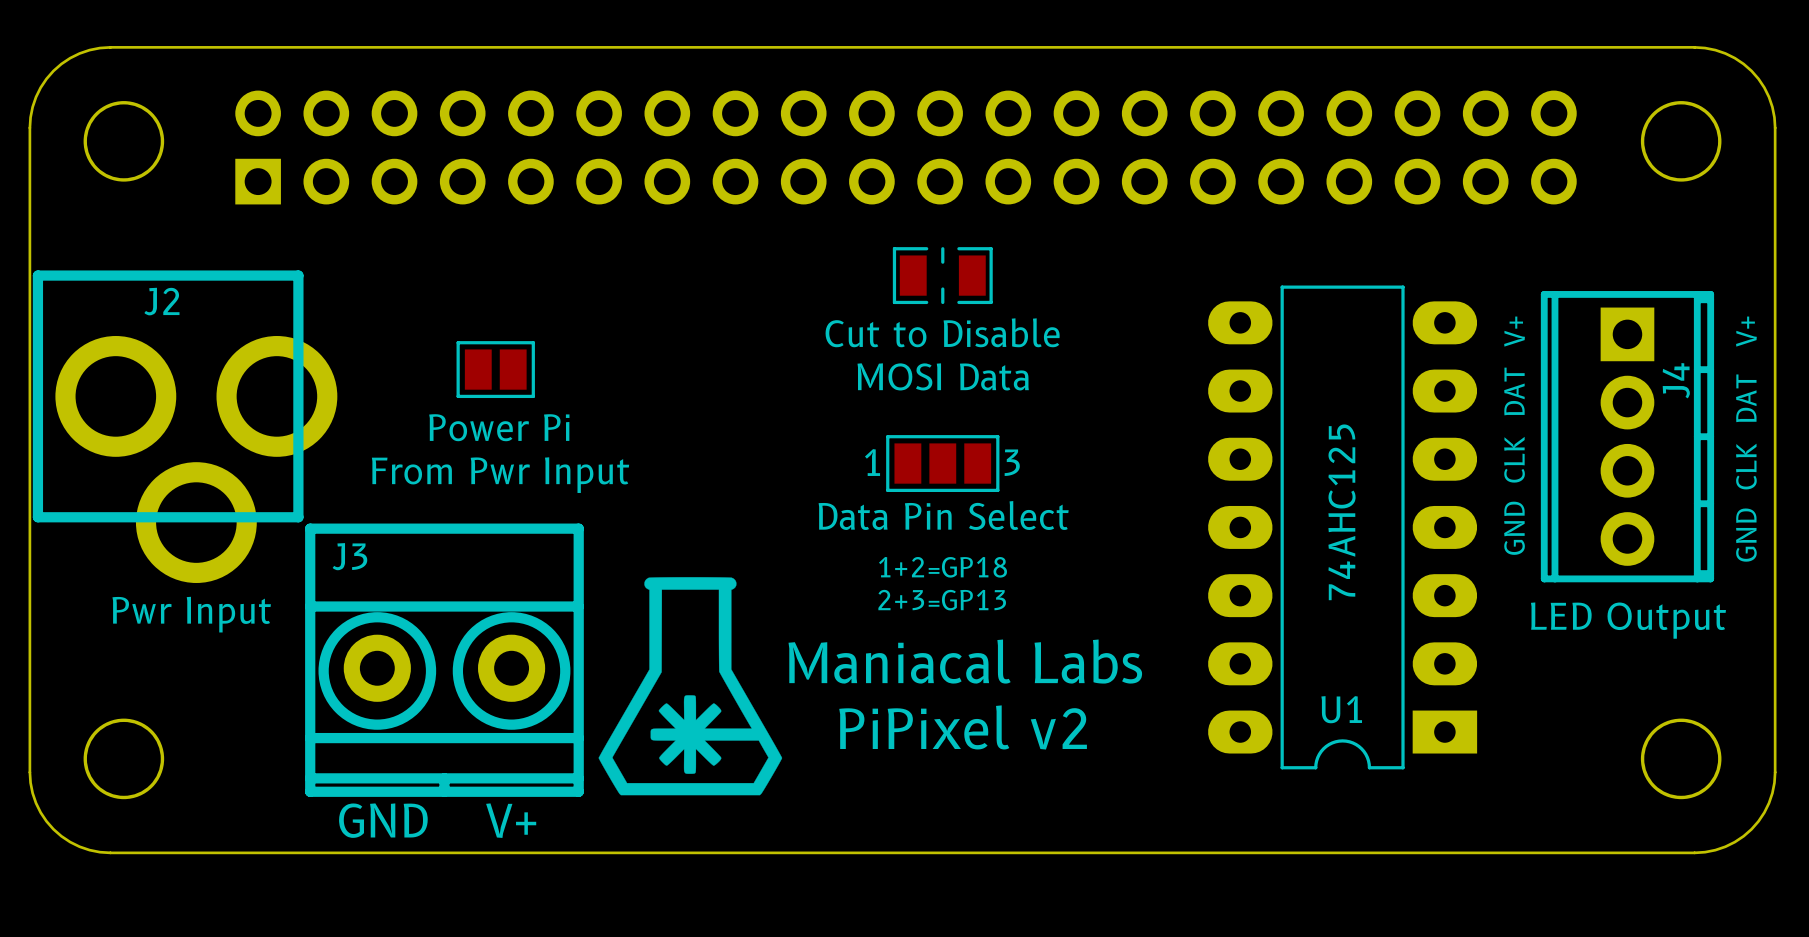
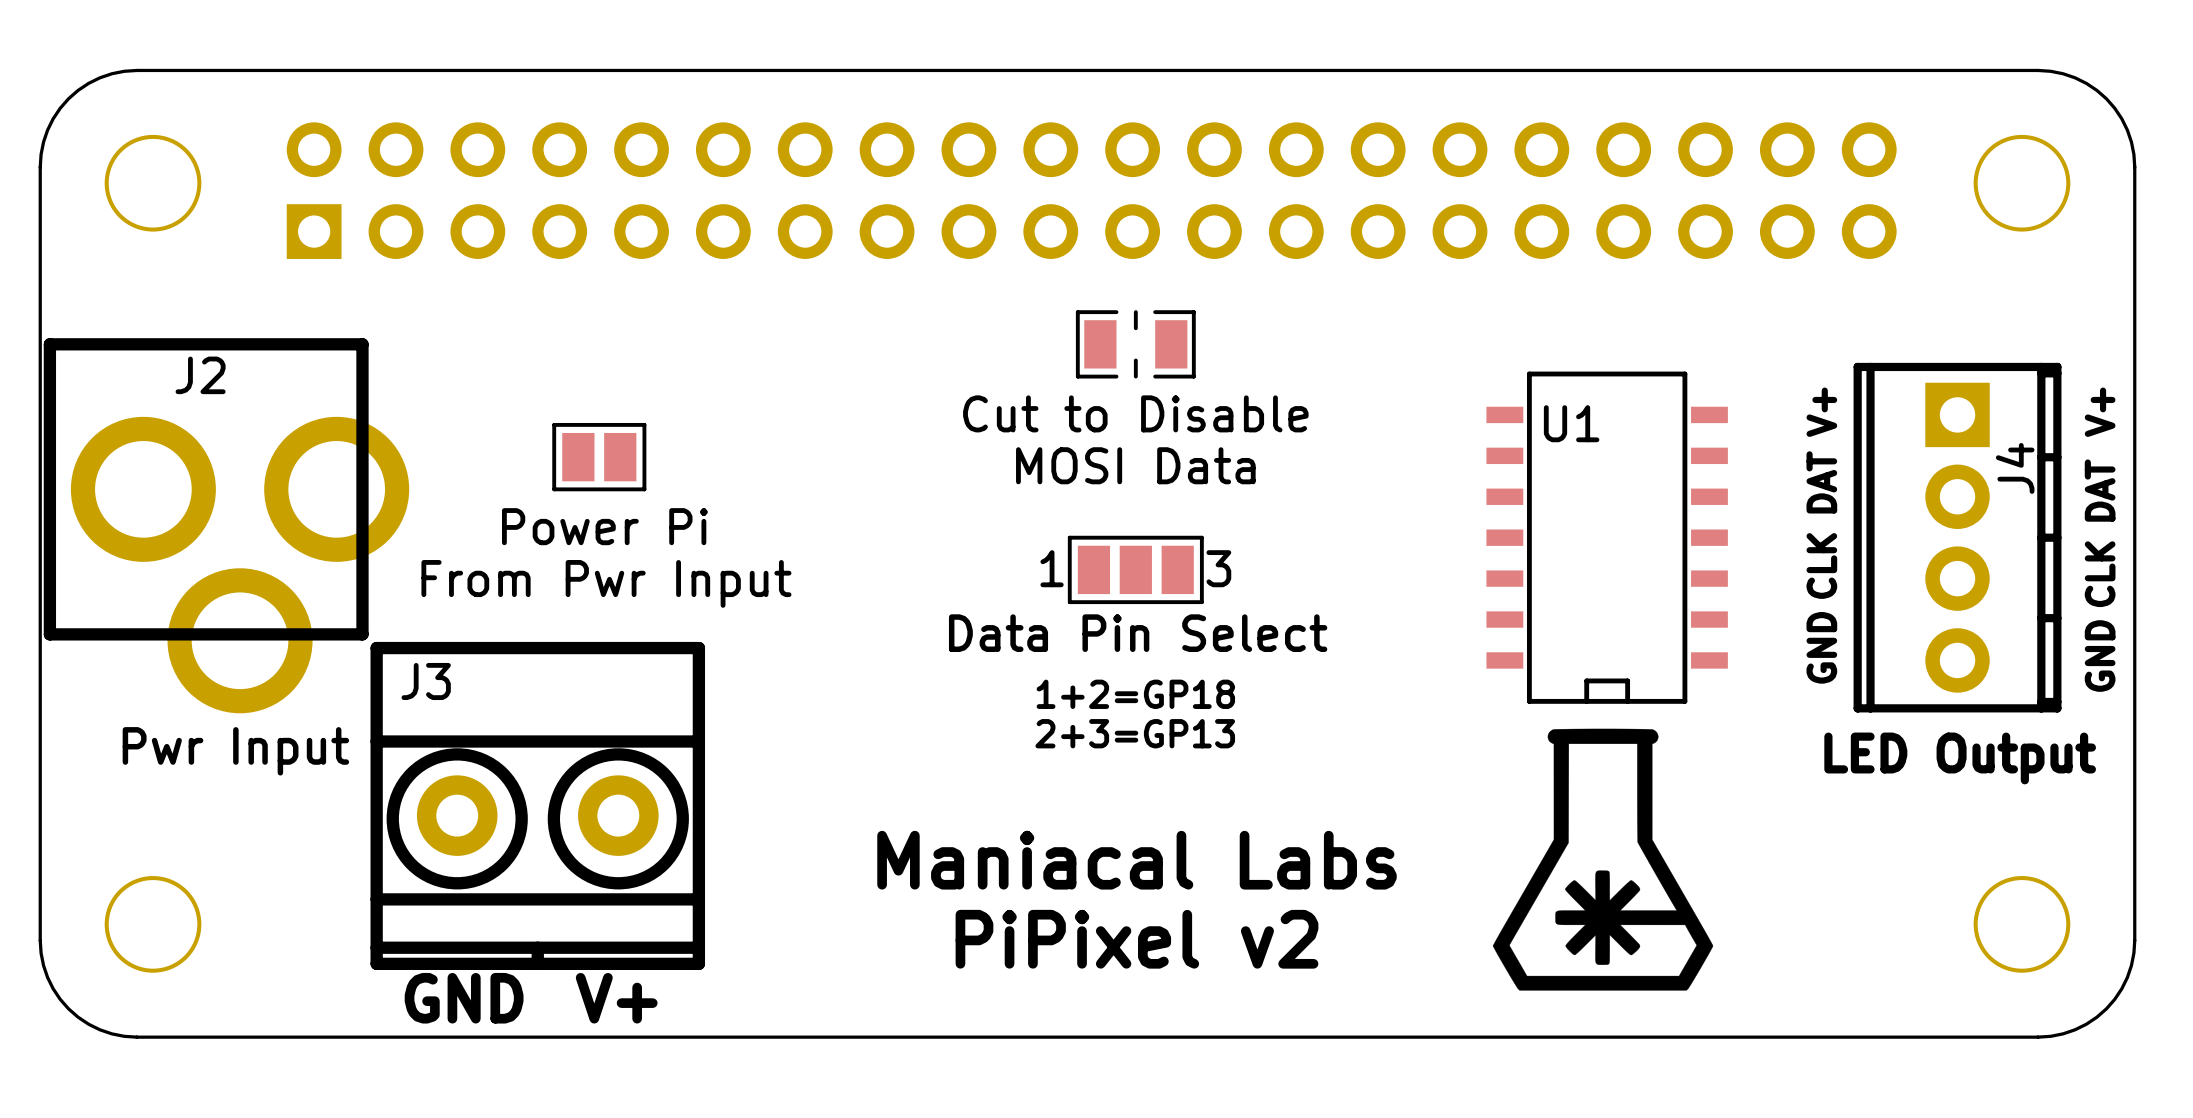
U1 footprint: [1208, 285, 1478, 770] -> [1486, 371, 1728, 704]
U1 value: 74AHC125 (1342, 512) -> none
text position: Maniacal Labs (965, 661) -> Maniacal Labs (1137, 860)
drawing position: (690, 686) -> (1603, 859)
U1 name position: U1 (1341, 709) -> U1 (1571, 423)
text position: PiPixel v2 (963, 727) -> PiPixel v2 (1137, 939)

